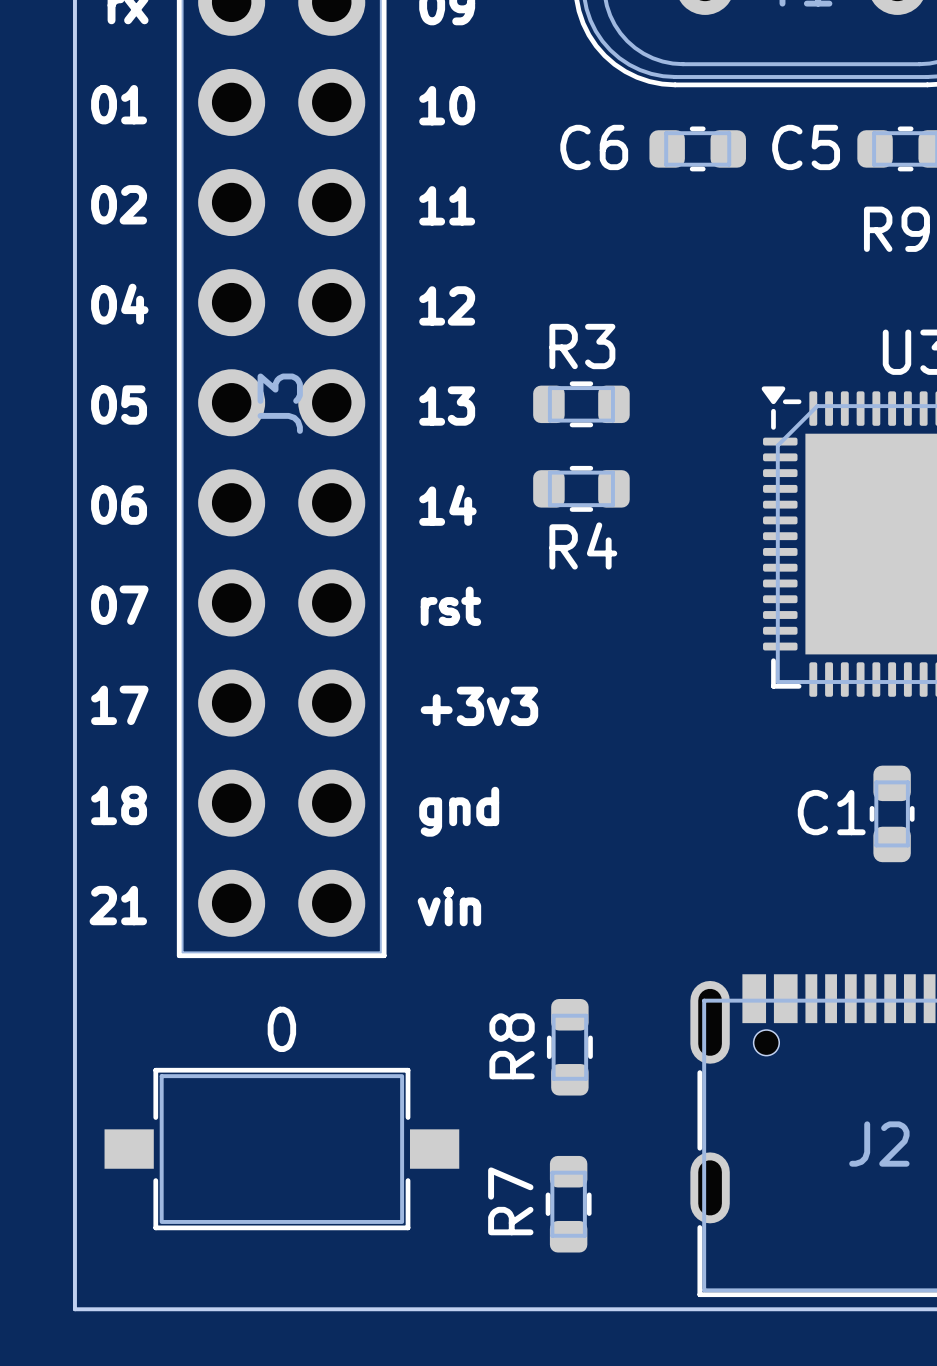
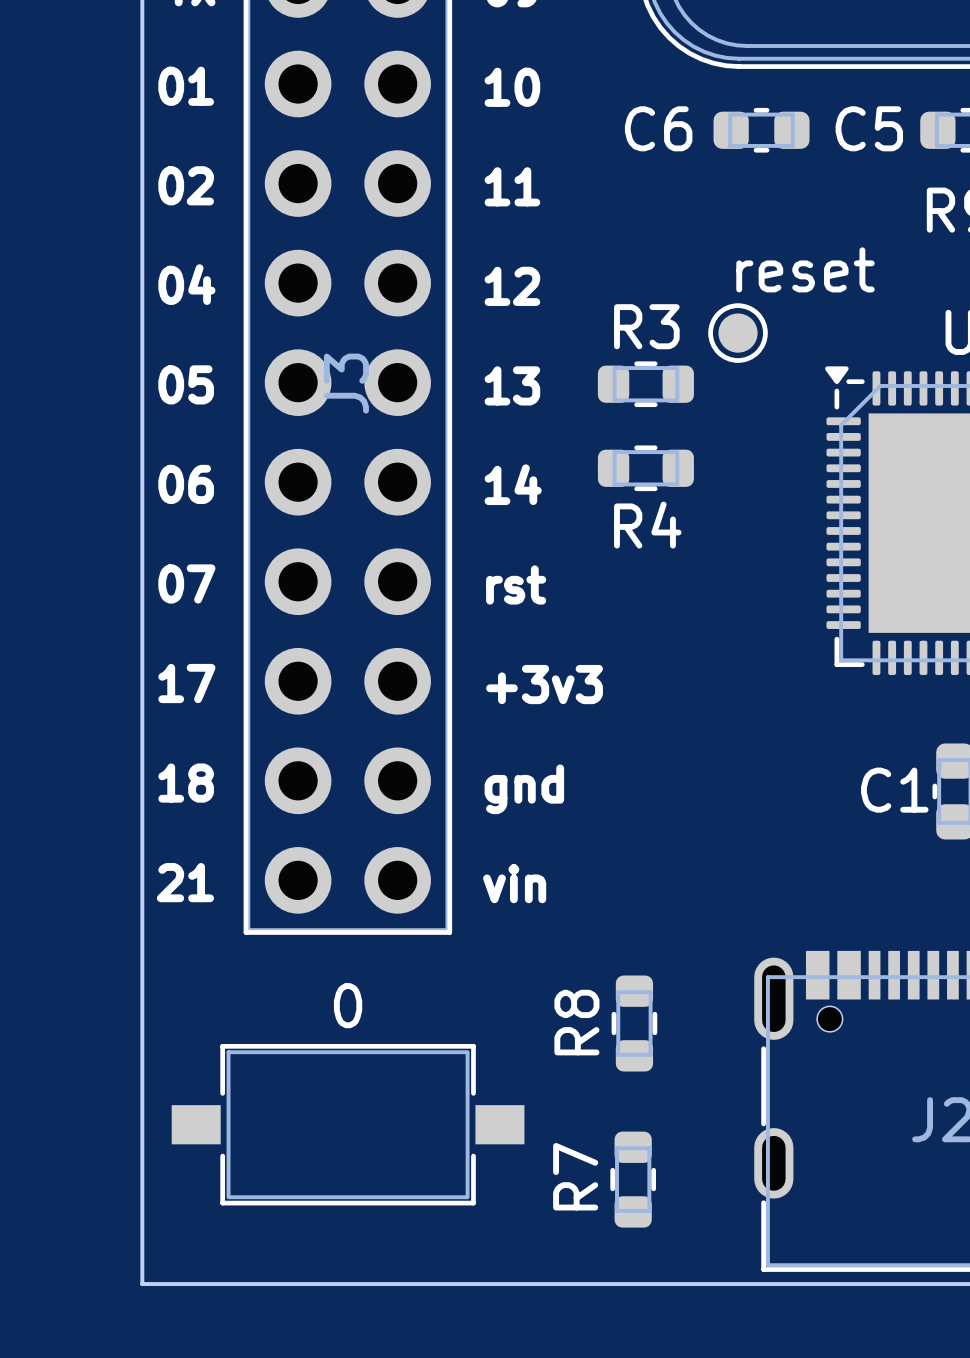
reset: none -> (738, 333)

